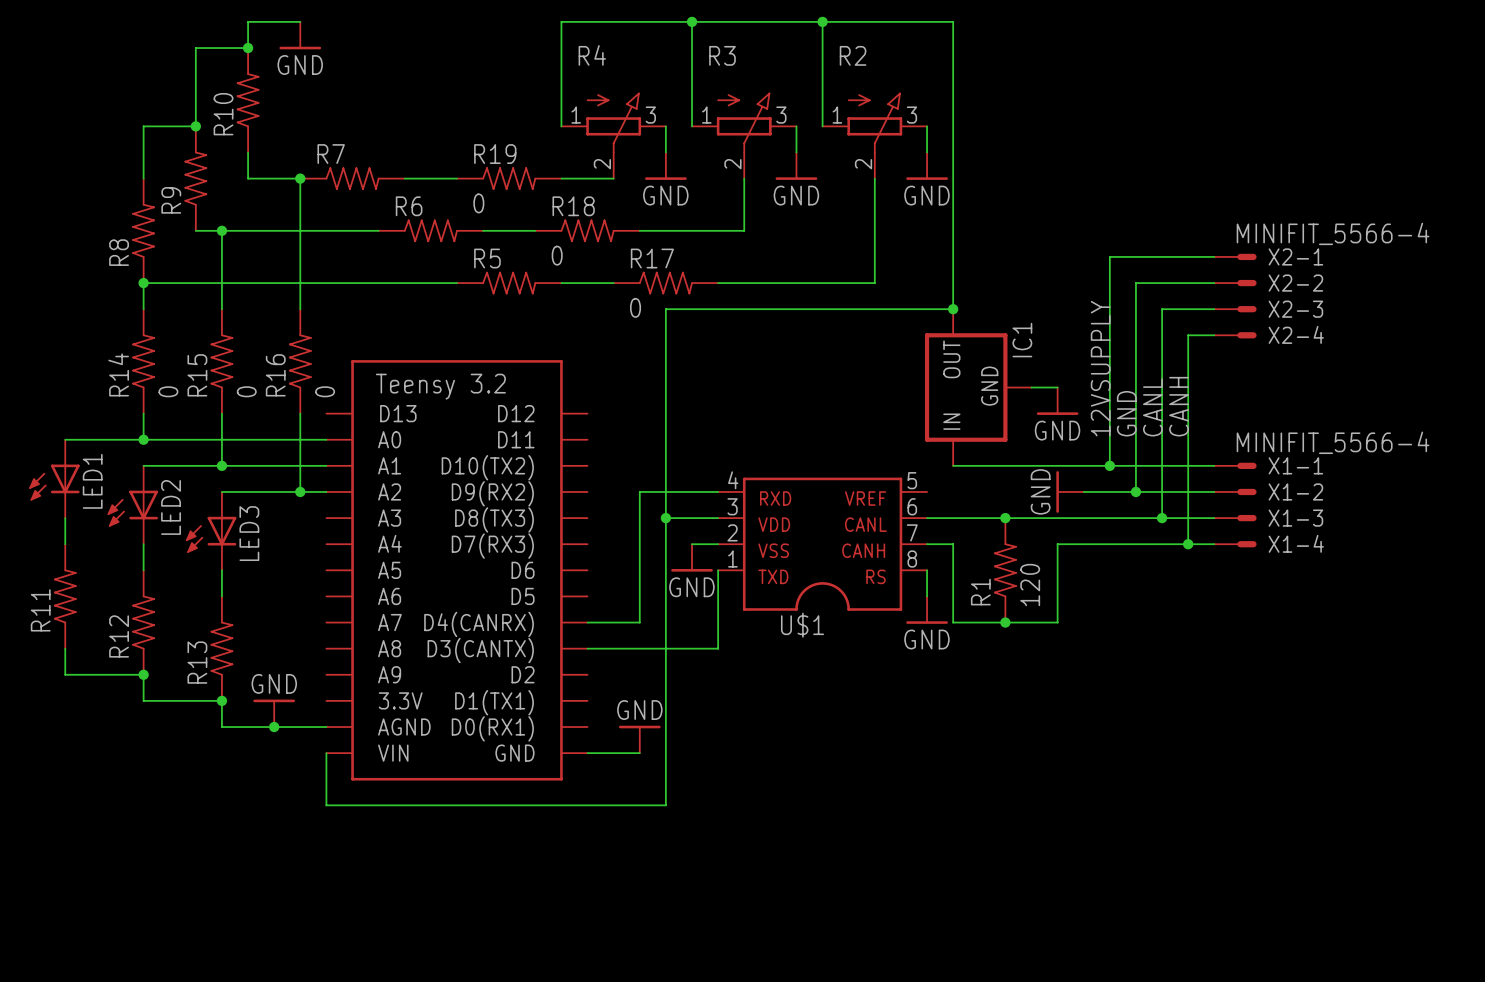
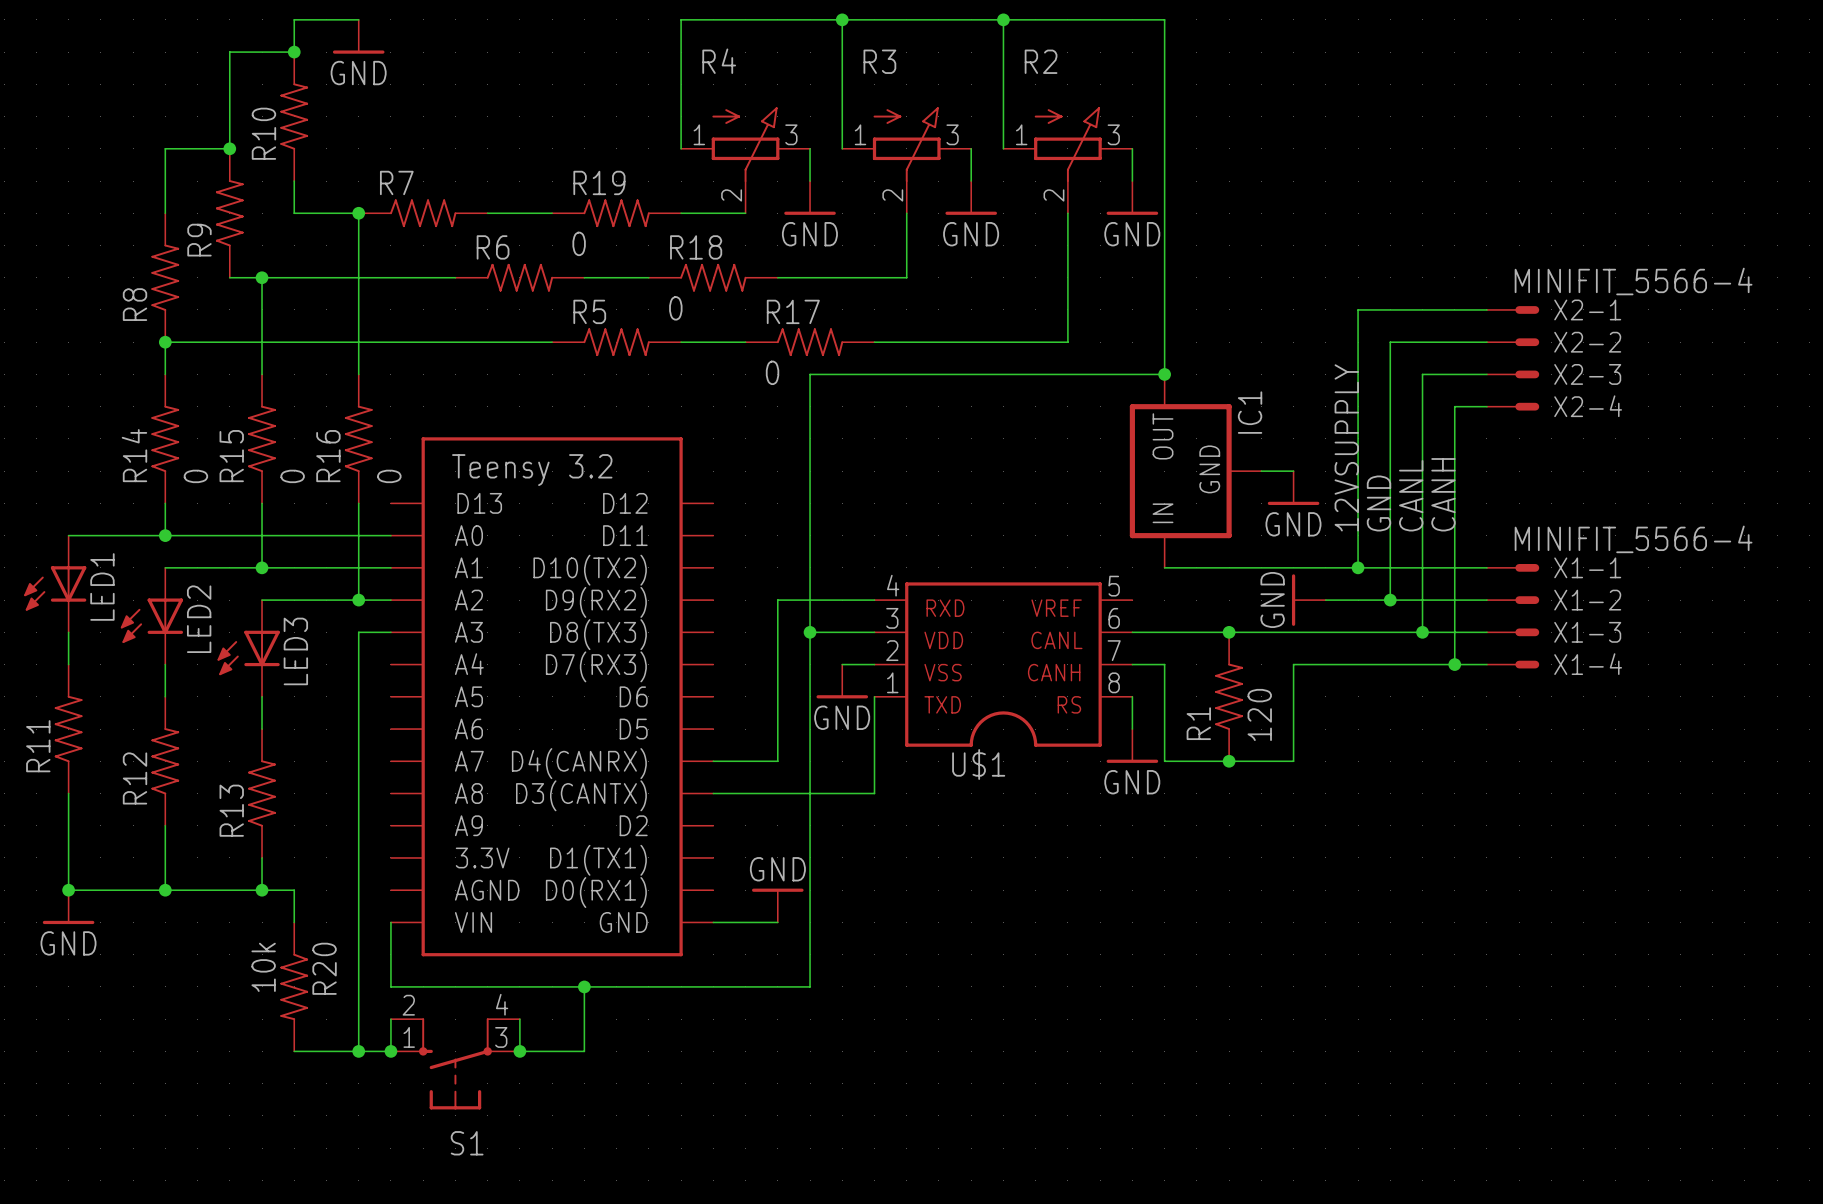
wire: none -> (390, 632) (358, 632) (358, 1051)
wire: (65, 674) (143, 674) -> (68, 825) (68, 890) (262, 890)
junction: (143, 674) -> none
wire: (143, 700) (221, 700) -> (165, 857) (165, 890)
junction: (221, 700) -> none
power symbol rotation: 0° (274, 700) -> 180° (68, 922)
power symbol position: GND (274, 713) -> GND (68, 907)
junction: none -> (68, 890)
junction: none -> (165, 890)
junction: none -> (262, 890)
wire: (248, 727) (326, 727) -> (294, 890) (294, 922)
junction: (274, 727) -> none
R20: none -> 10k (294, 986)
wire: none -> (584, 986) (584, 1051) (519, 1051) (519, 1019)
junction: none -> (584, 986)
wire: none -> (390, 1019) (390, 1051) (294, 1051)
junction: none -> (358, 1051)
junction: none -> (390, 1051)
junction: none -> (519, 1051)
S1: none -> (455, 1063)

